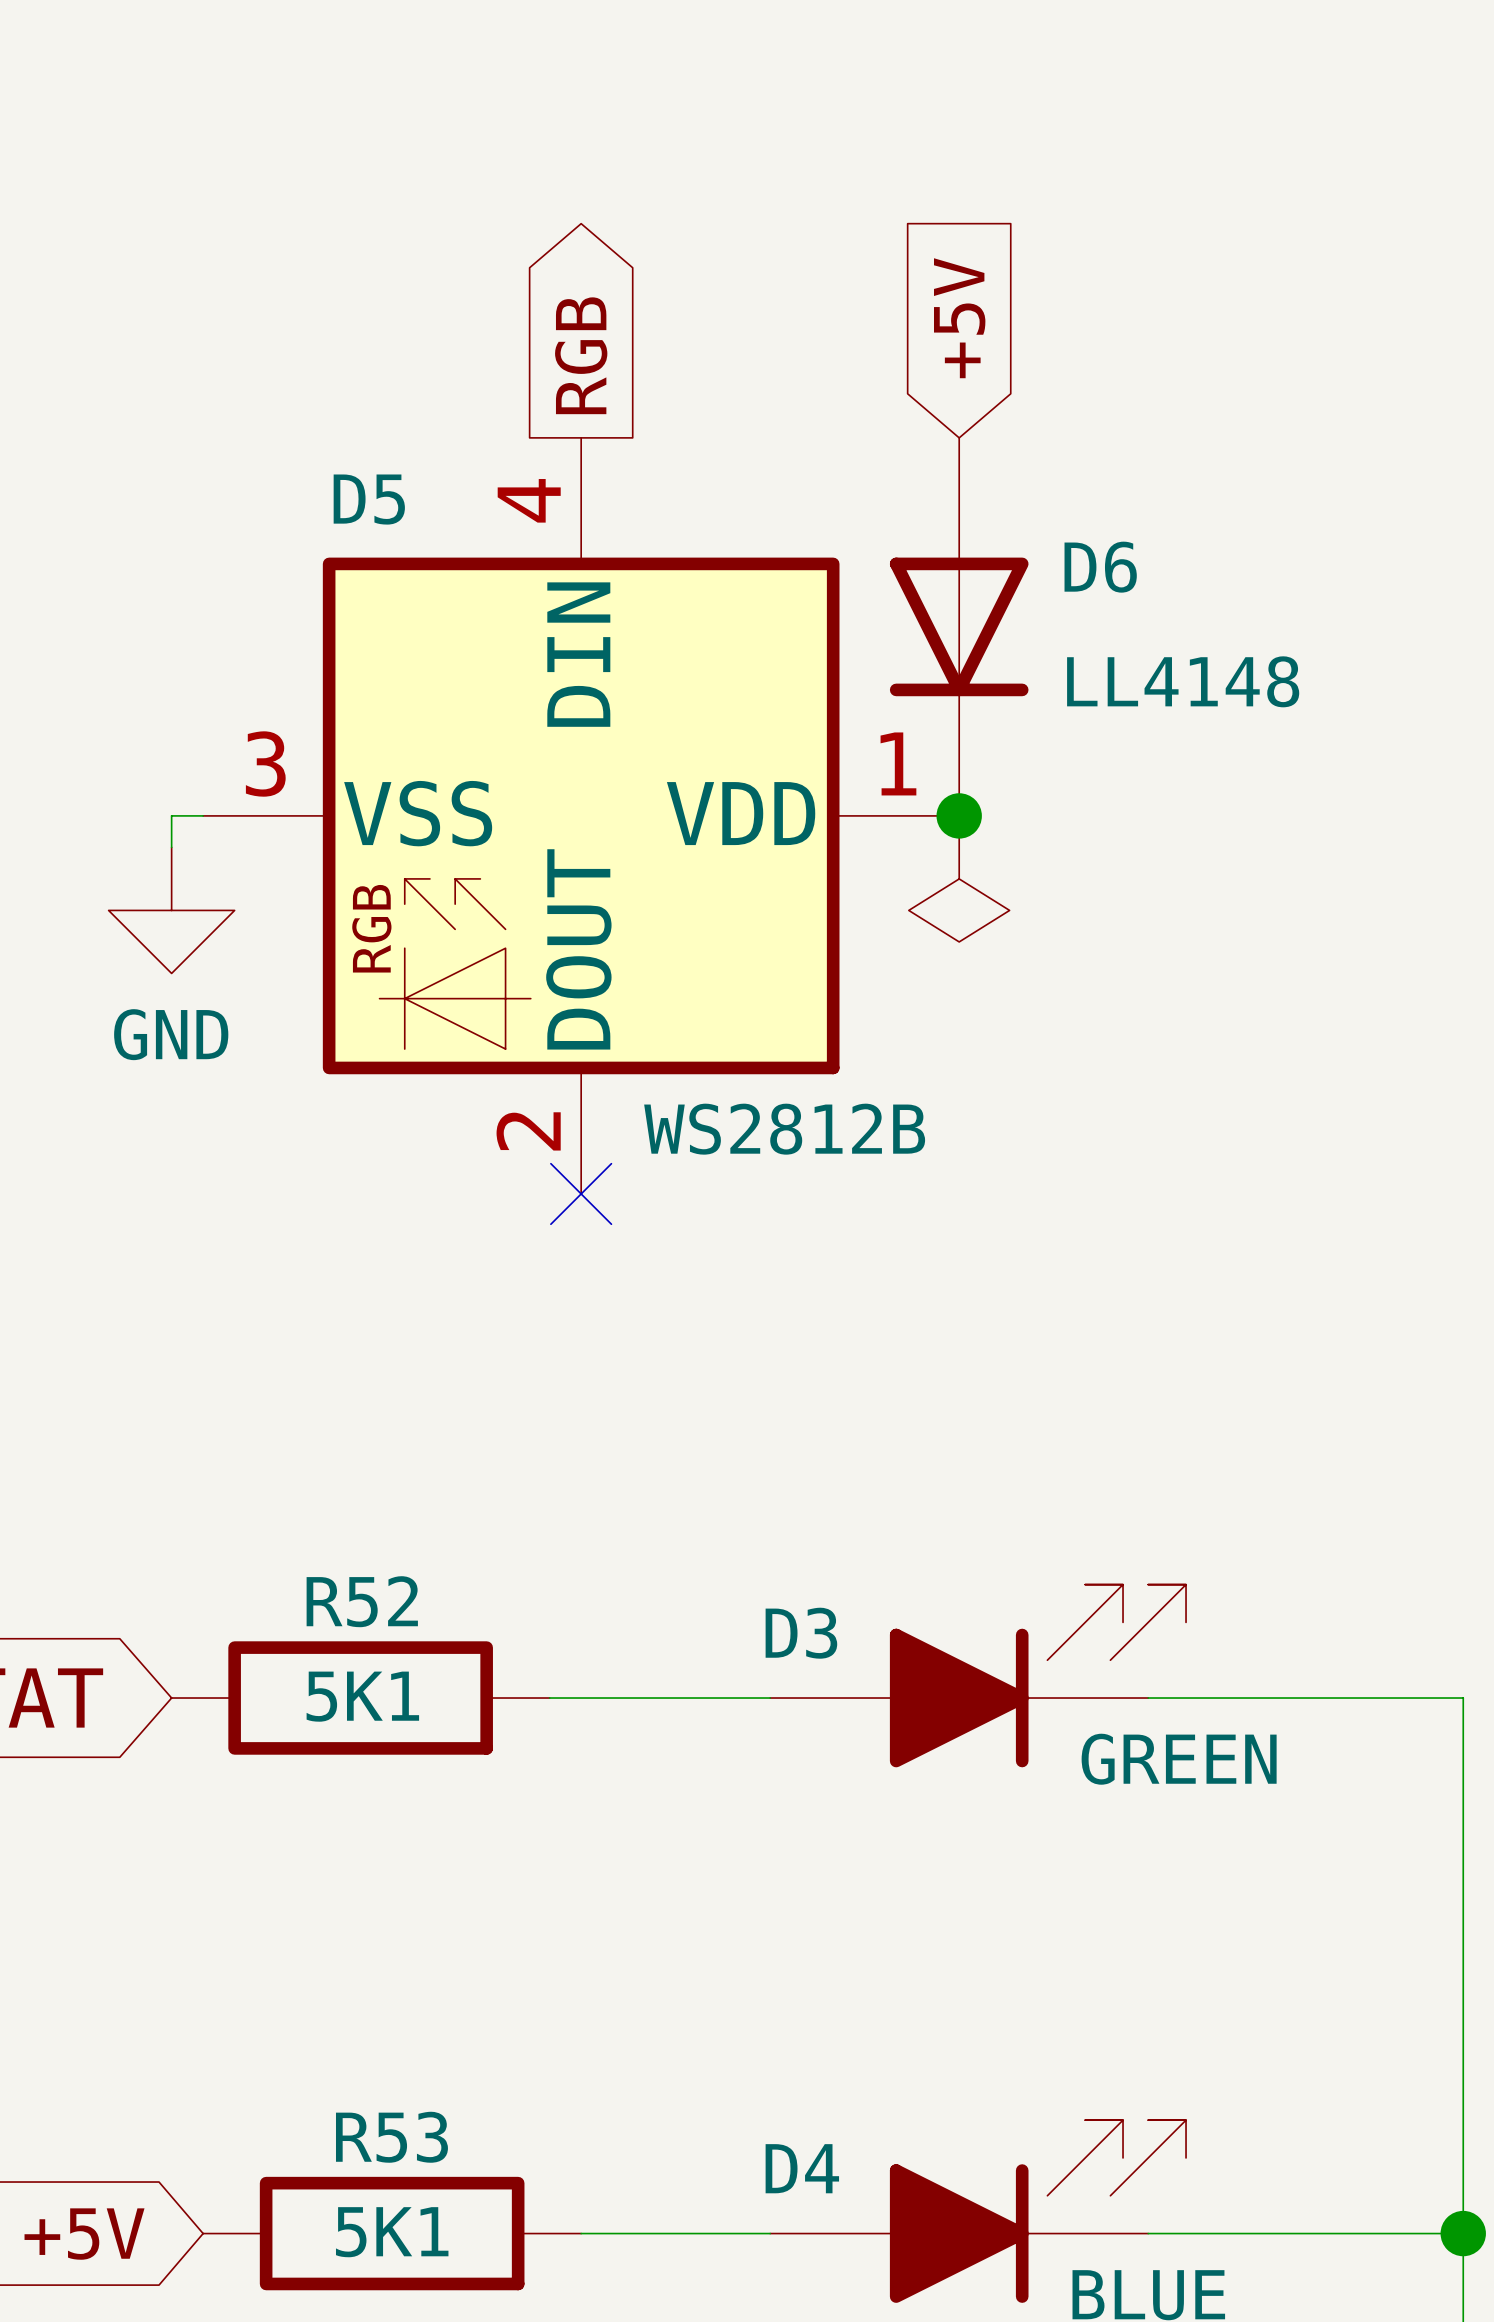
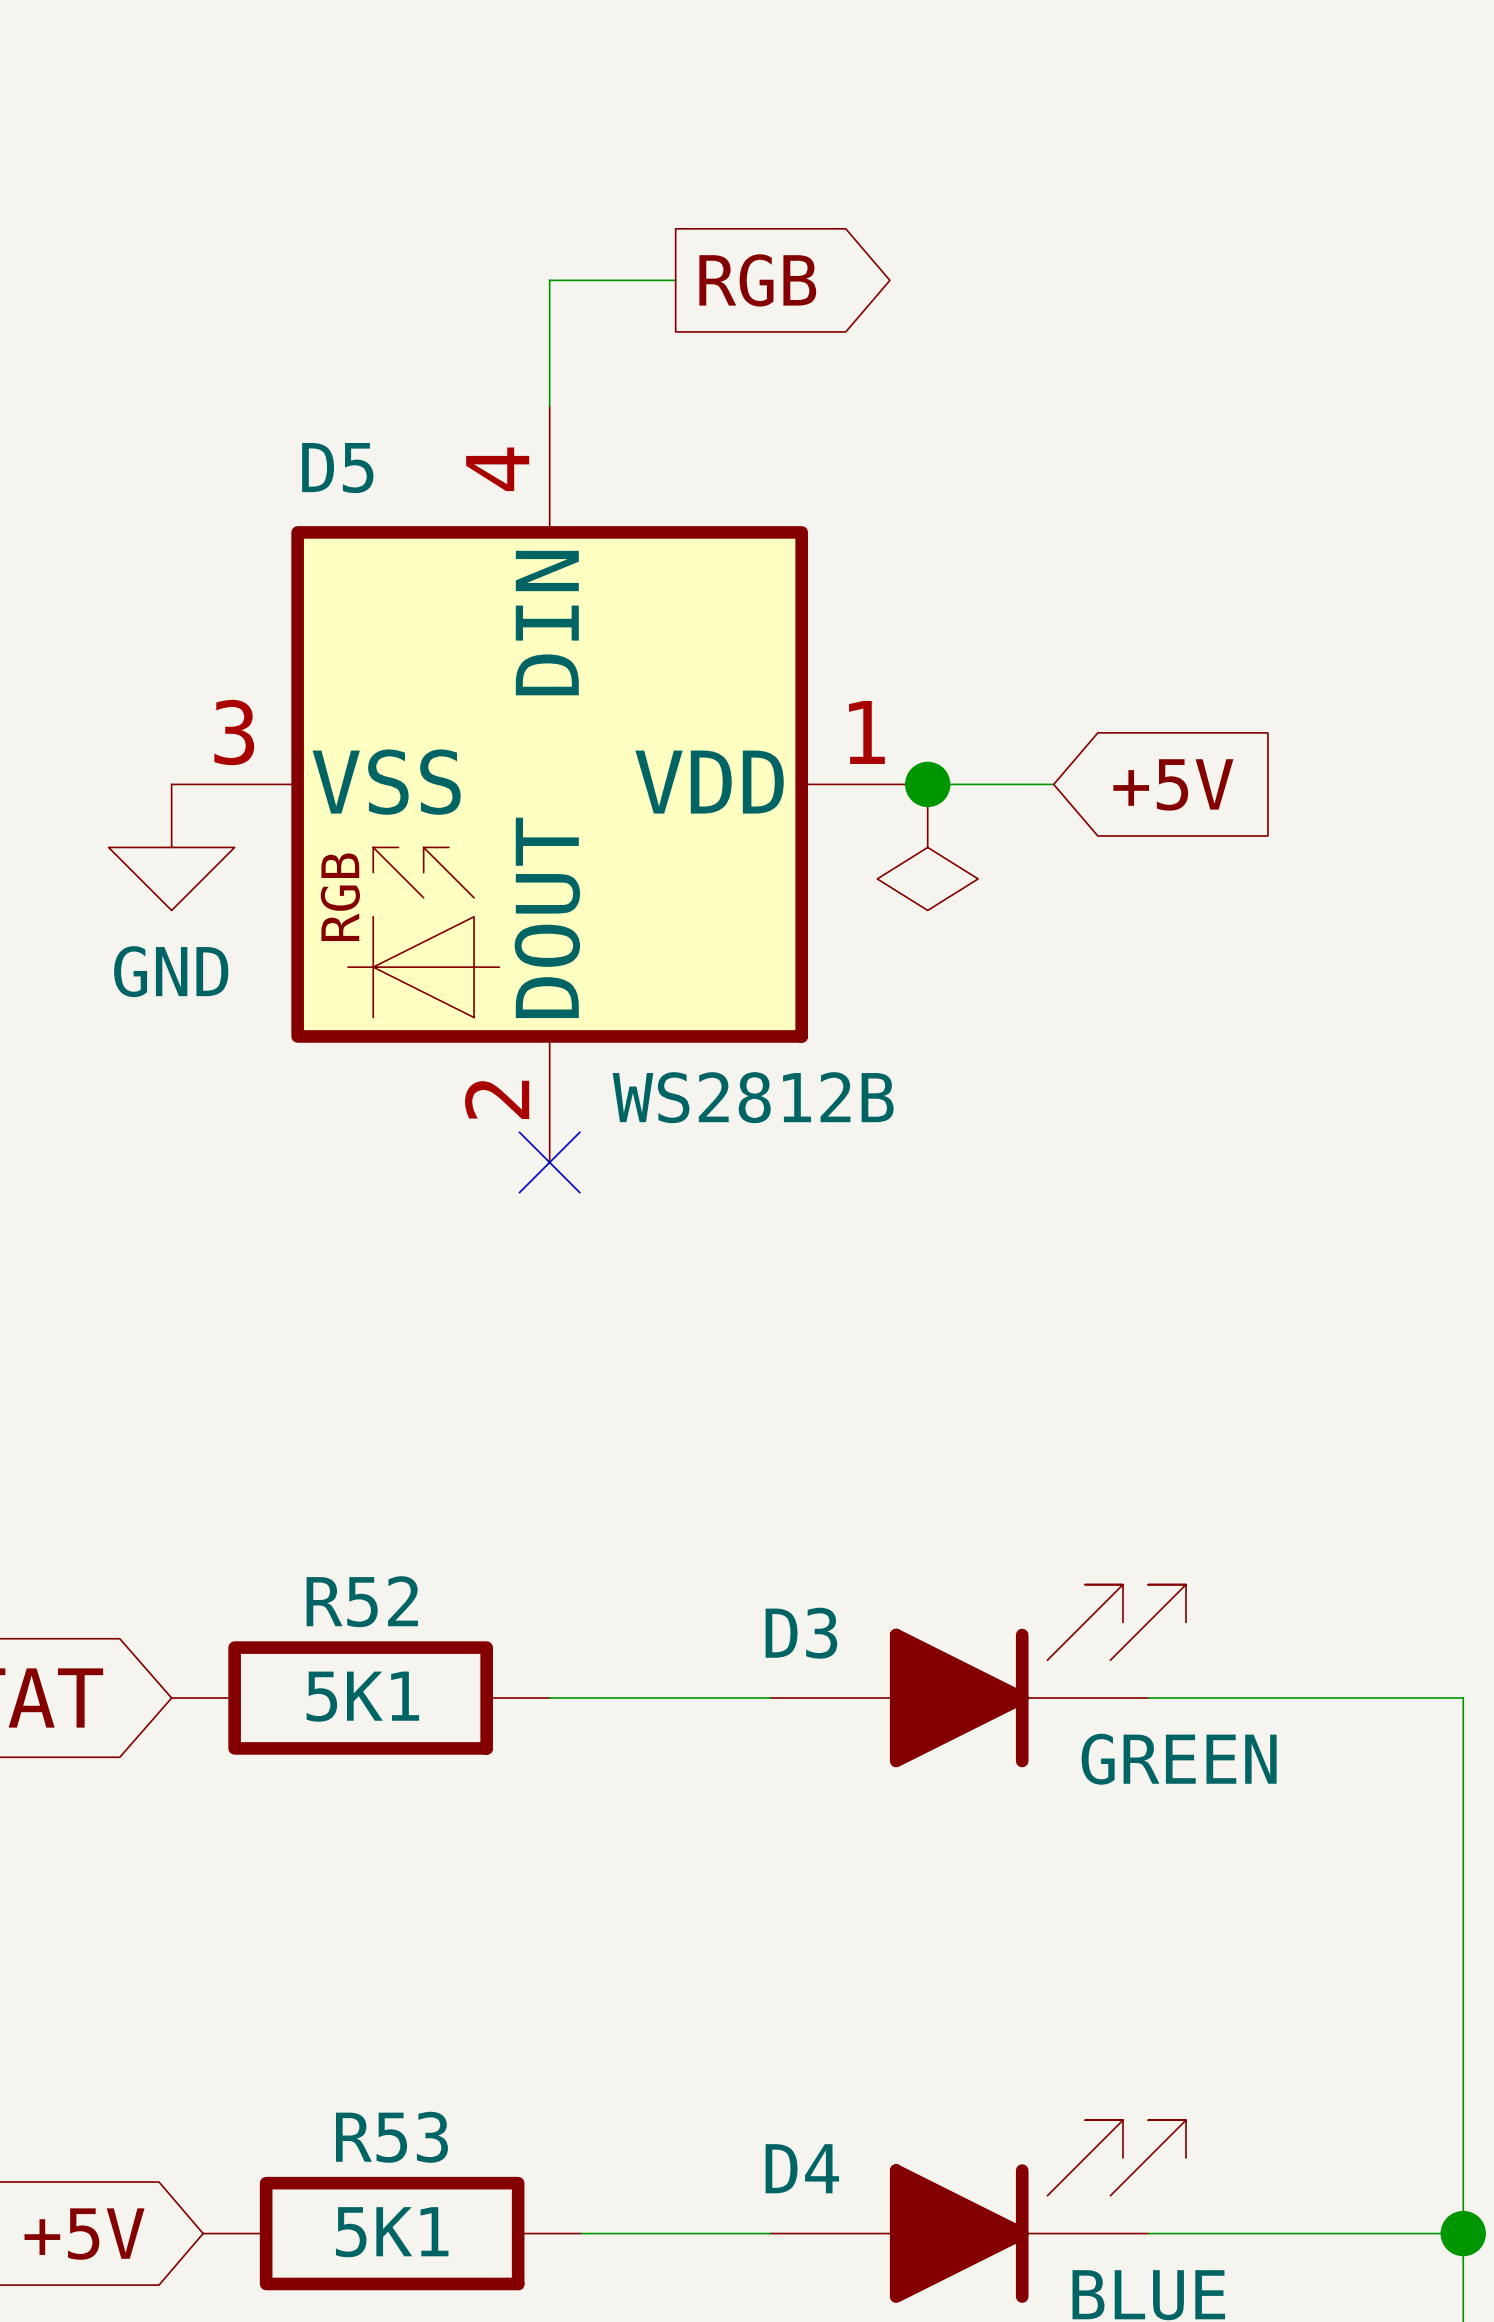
wire: none -> (675, 280) (549, 280) (549, 406)
global label rotation: 0° (959, 318) -> 90° clockwise (1173, 784)
global label position: +5V (959, 318) -> +5V (1173, 784)
global label rotation: 0° (581, 355) -> 90° clockwise (757, 280)
D6: LL4148 (959, 626) -> none
wire: none -> (927, 784) (1053, 784)
wire: (203, 815) (171, 815) (171, 847) -> none
D5 position: (581, 815) -> (549, 784)
junction position: (959, 815) -> (927, 784)
power symbol position: (959, 878) -> (927, 847)
power symbol position: GND (171, 910) -> GND (171, 847)
no-connect mark position: (581, 1193) -> (549, 1162)

